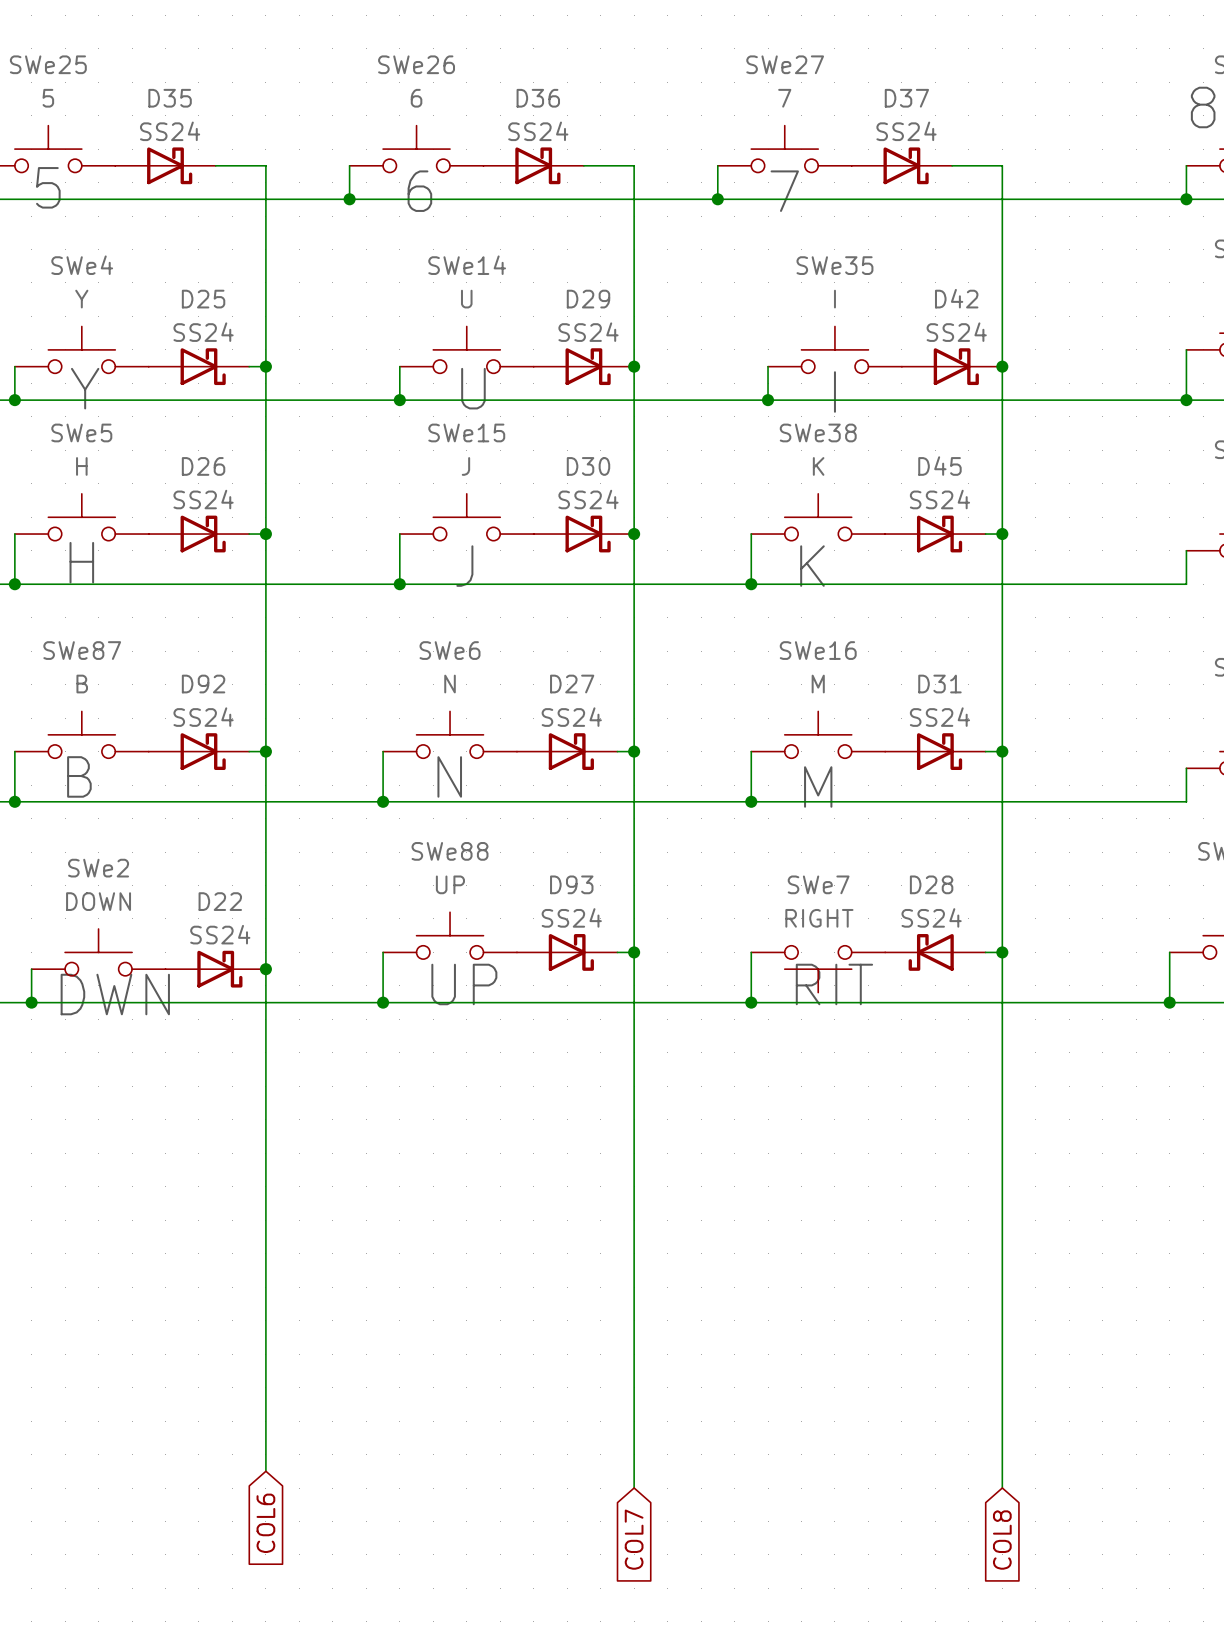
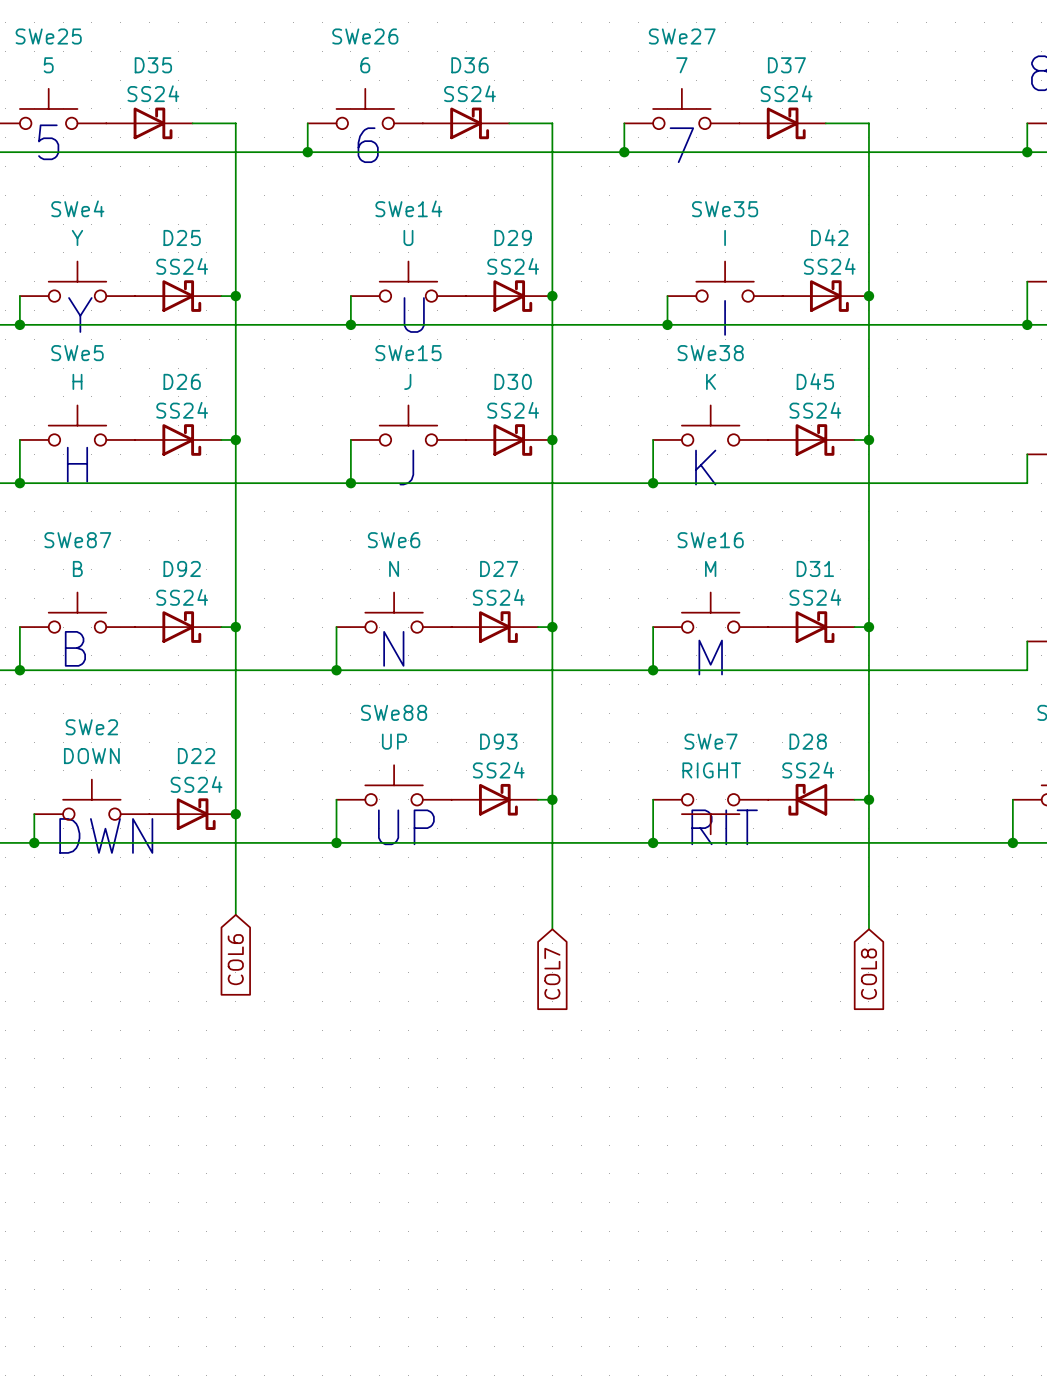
wire: (265, 1086) (265, 1471) -> none
wire: (634, 1103) (634, 1488) -> none
wire: (1002, 1103) (1002, 1488) -> none
global label: none -> COL6 (235, 959)
global label: none -> COL7 (552, 973)
global label: none -> COL8 (868, 974)
global label: COL6 (265, 1523) -> none
global label: COL7 (634, 1539) -> none
global label: COL8 (1002, 1540) -> none

